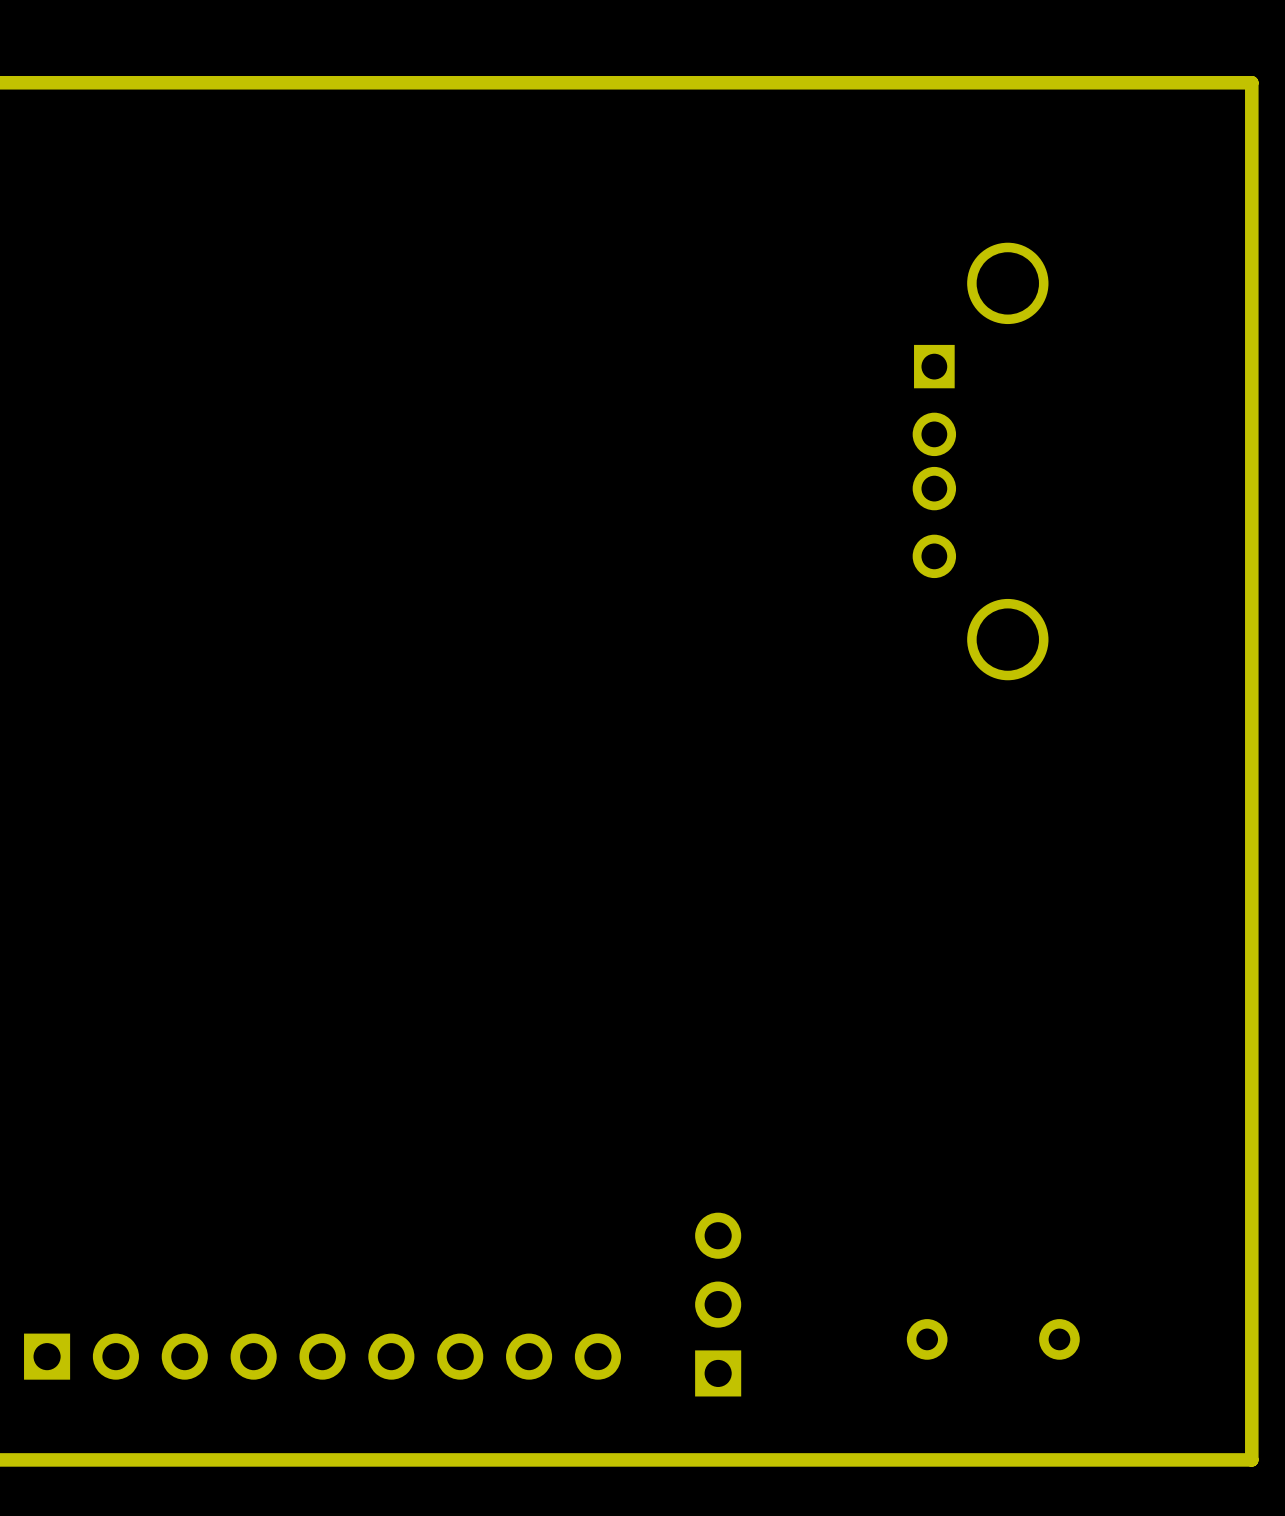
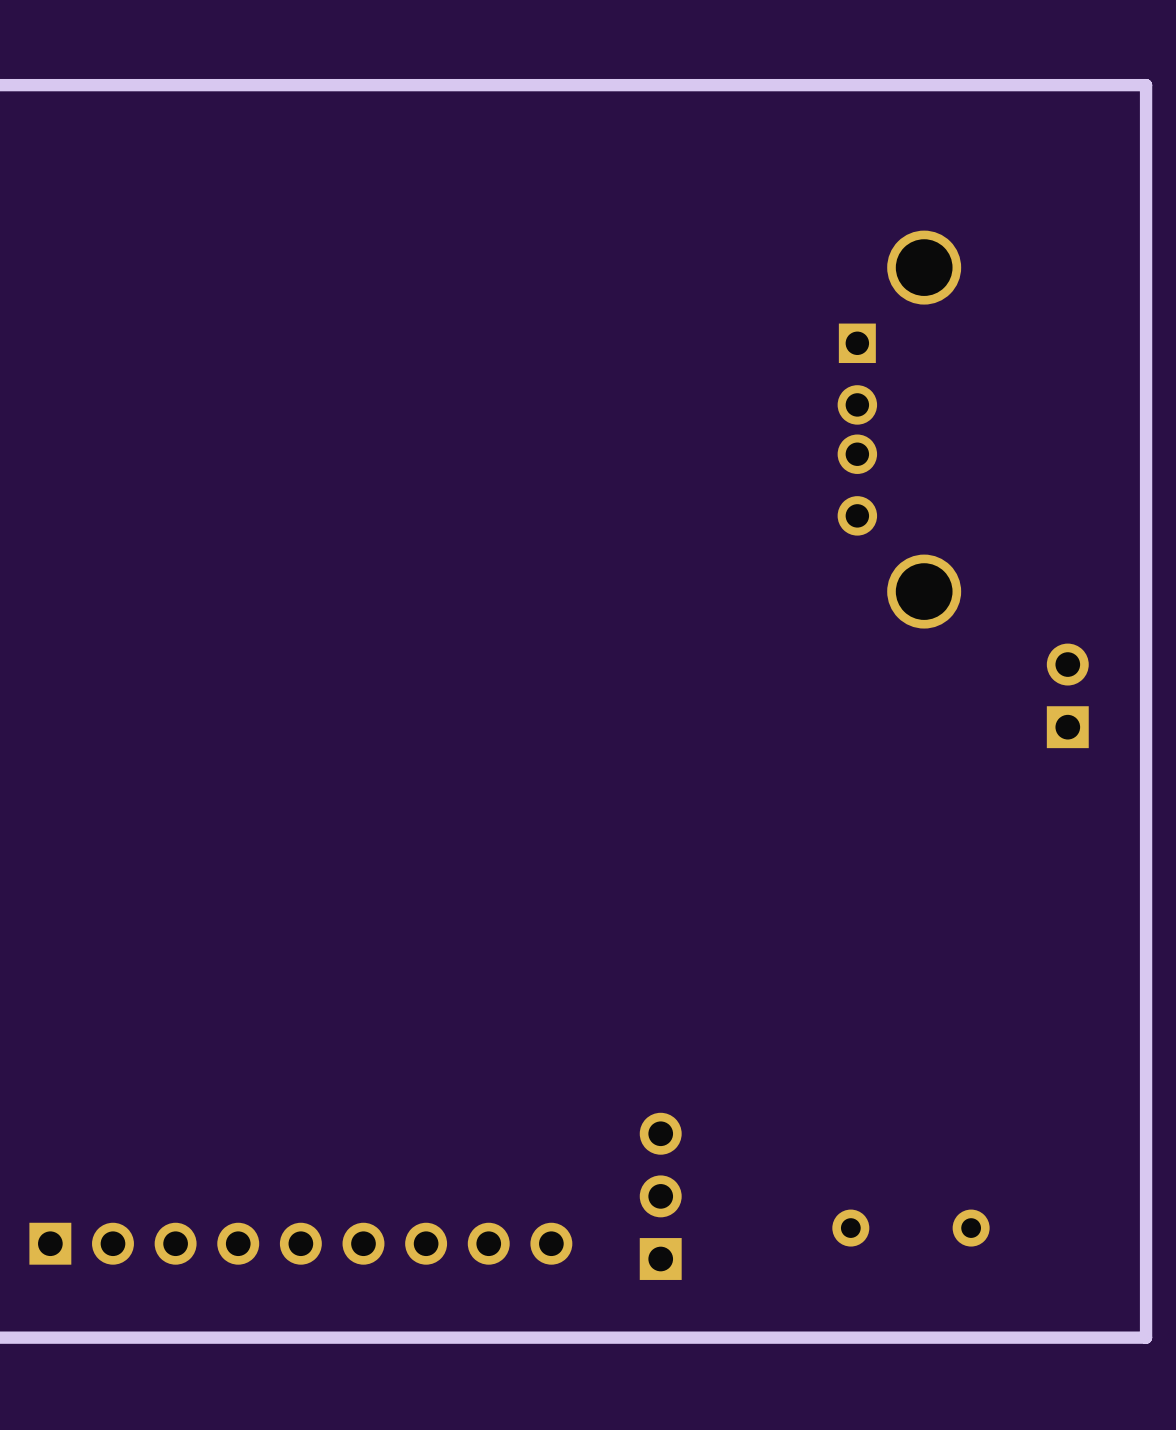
part: none -> (1067, 695)

